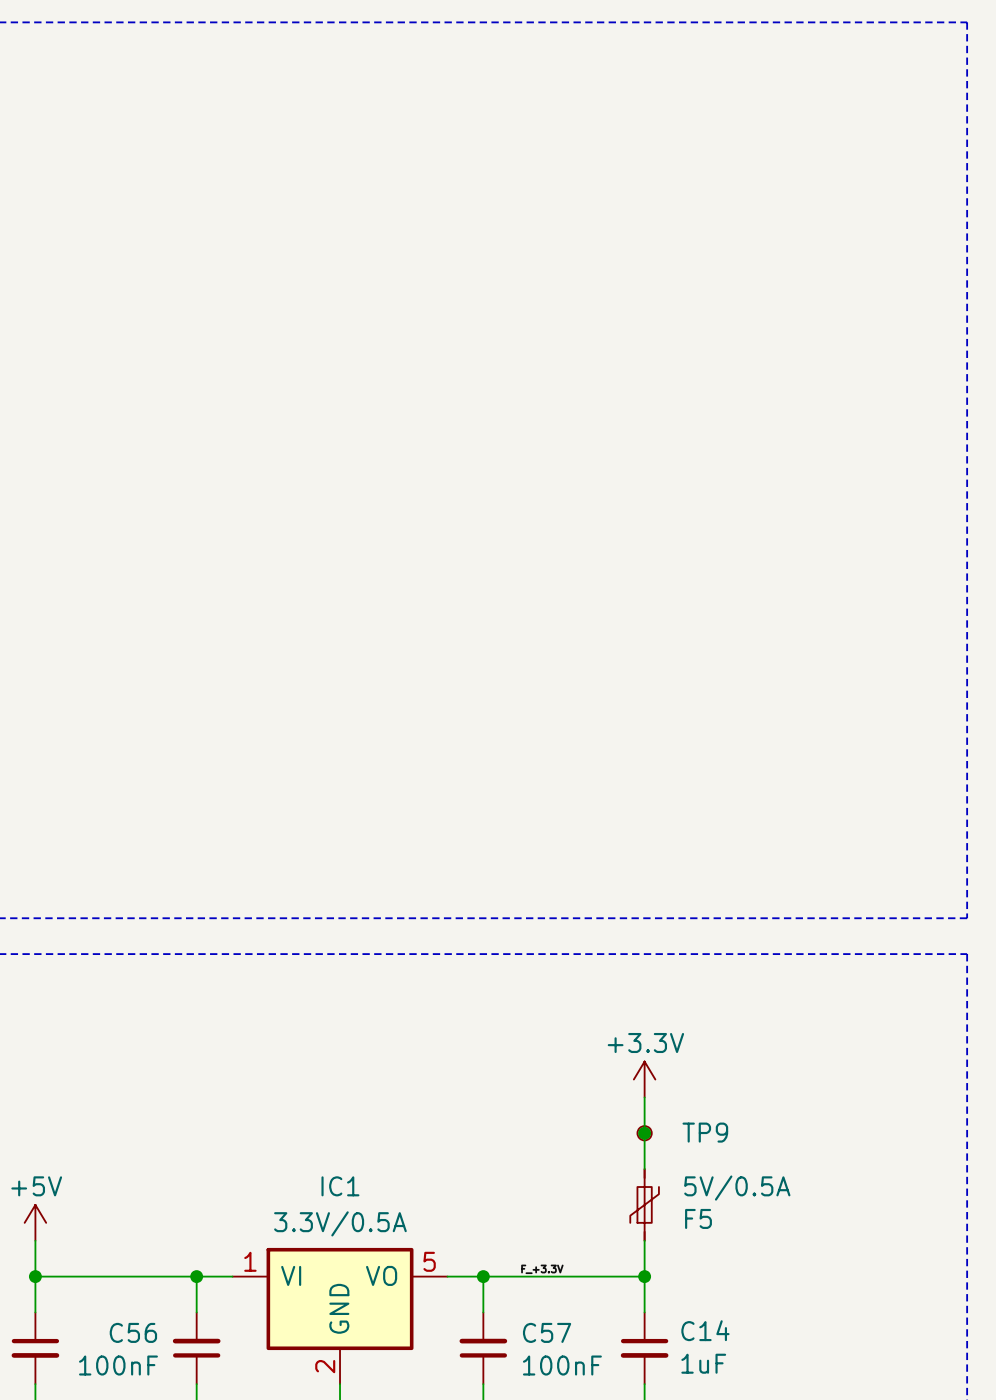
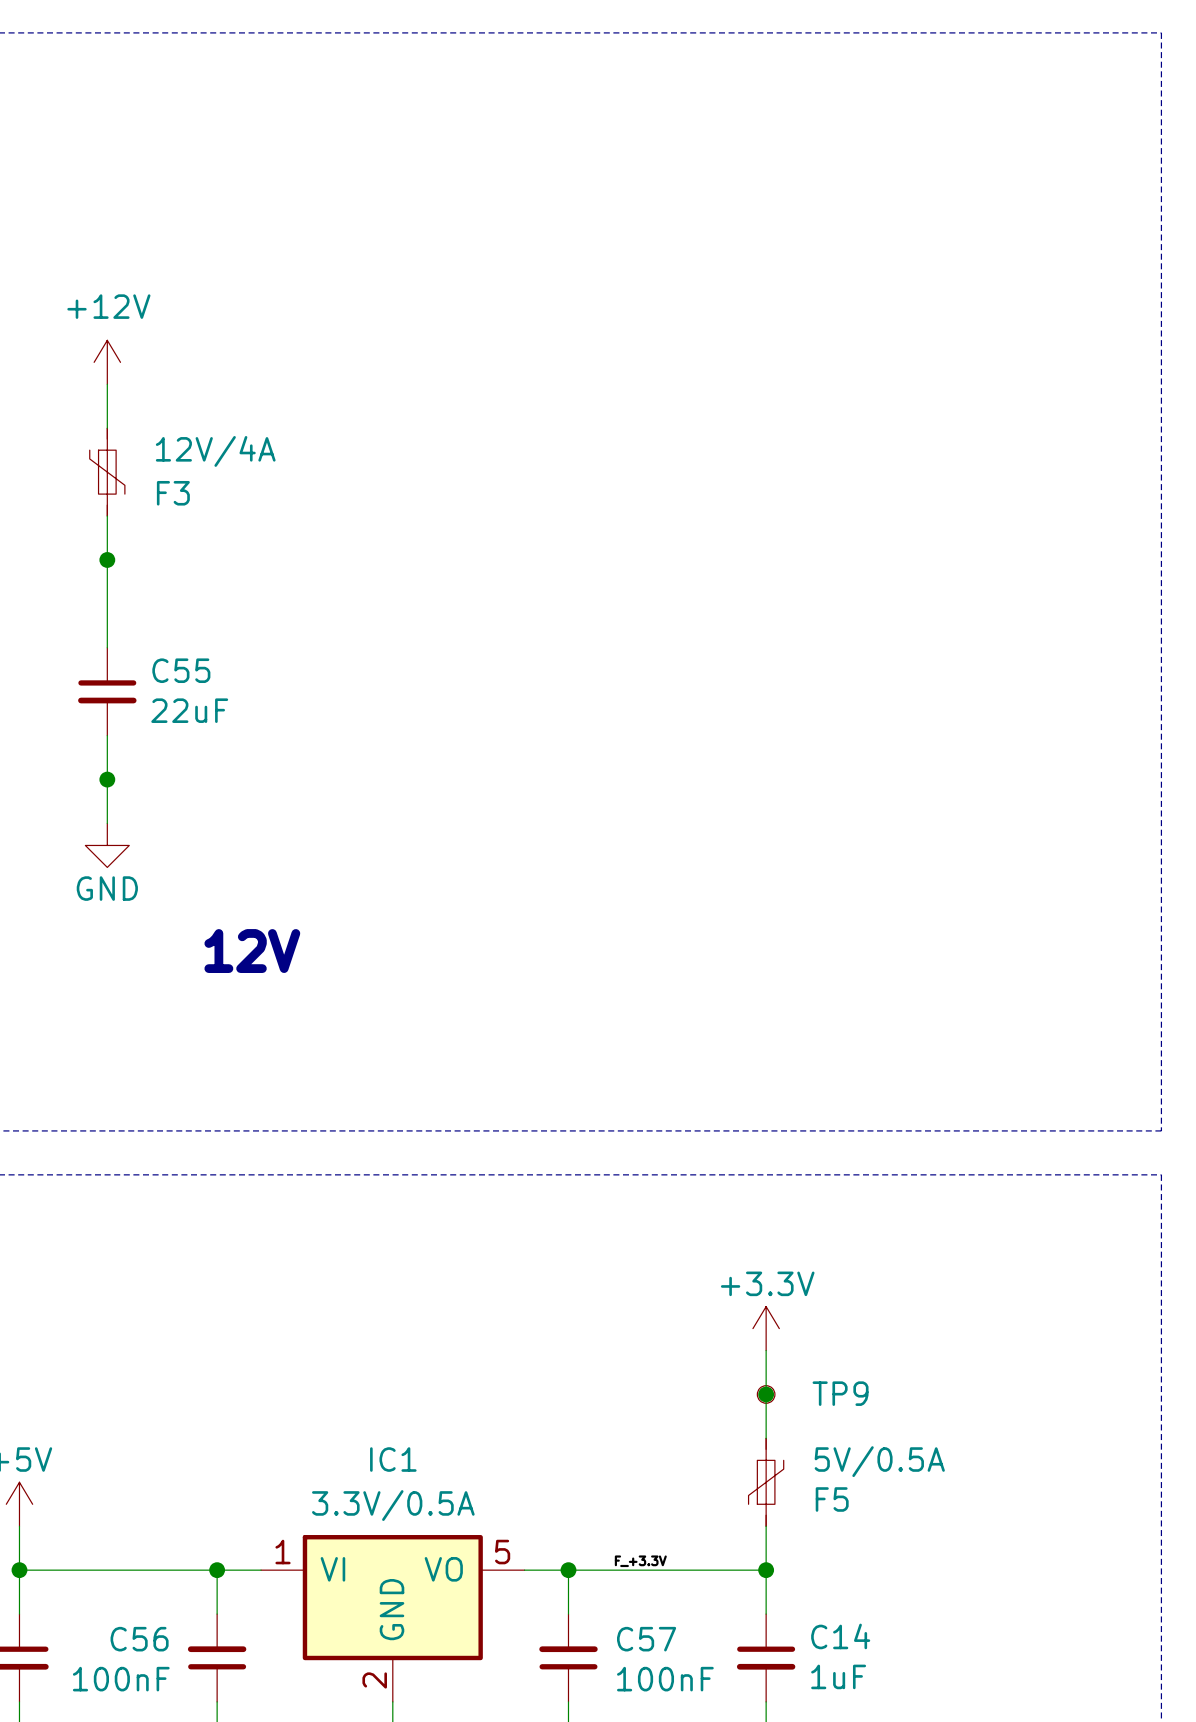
power symbol: none -> +12V (107, 362)
wire: none -> (107, 384) (107, 428)
F3: none -> 12V/4A (107, 472)
wire: none -> (107, 516) (107, 647)
junction: none -> (107, 559)
C55: none -> 22uF (107, 691)
wire: none -> (107, 735) (107, 823)
junction: none -> (107, 779)
power symbol: none -> GND (107, 845)
text: none -> 12V (252, 951)

